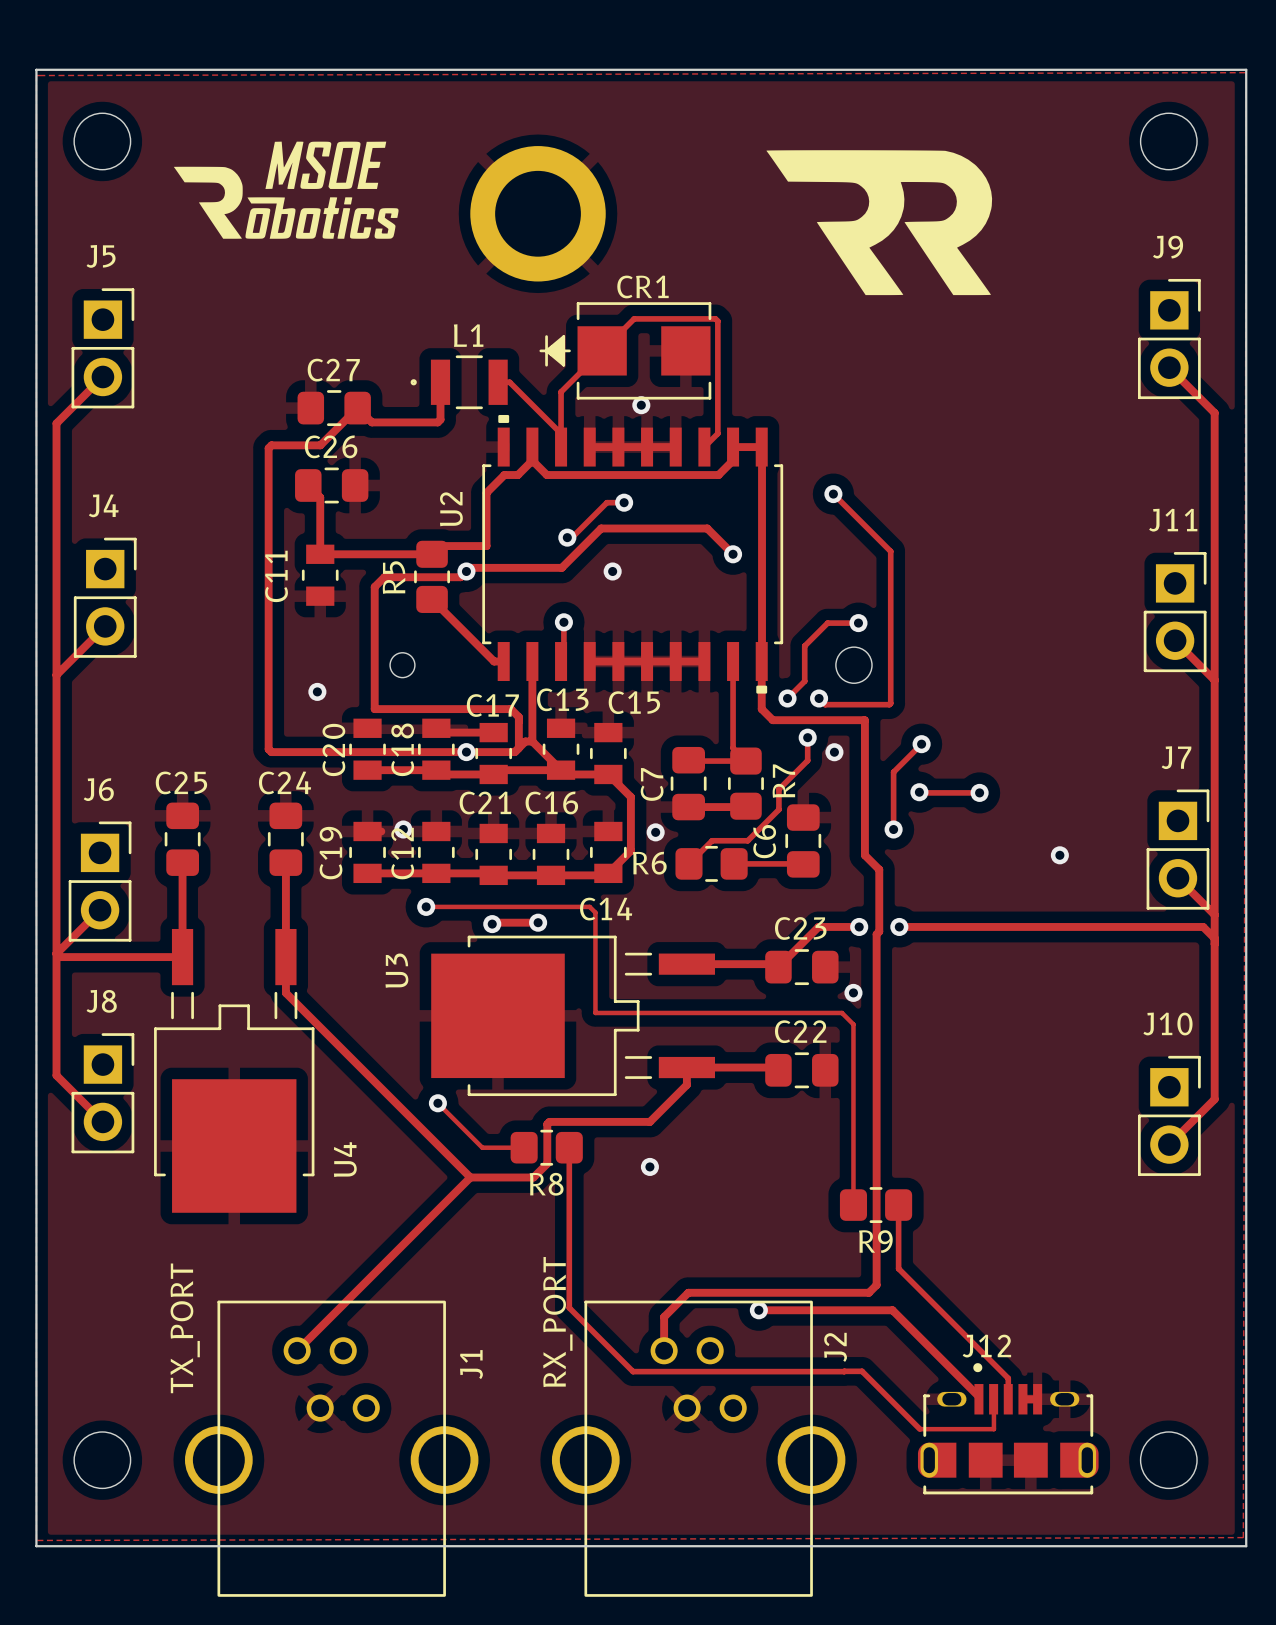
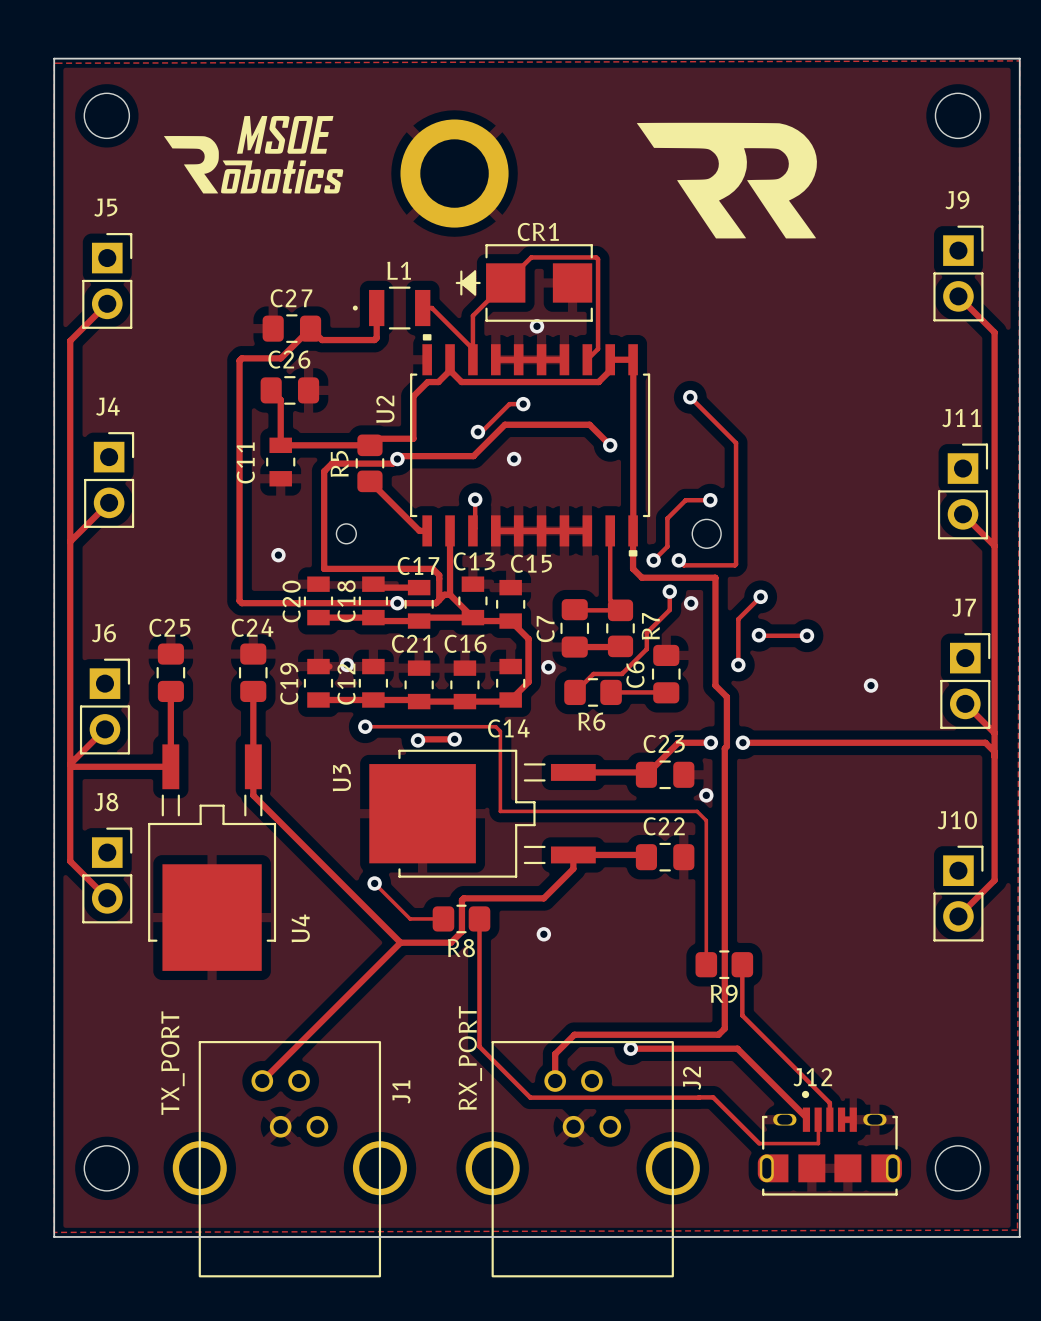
R6 name position: R6 (649, 863) -> R6 (591, 721)

